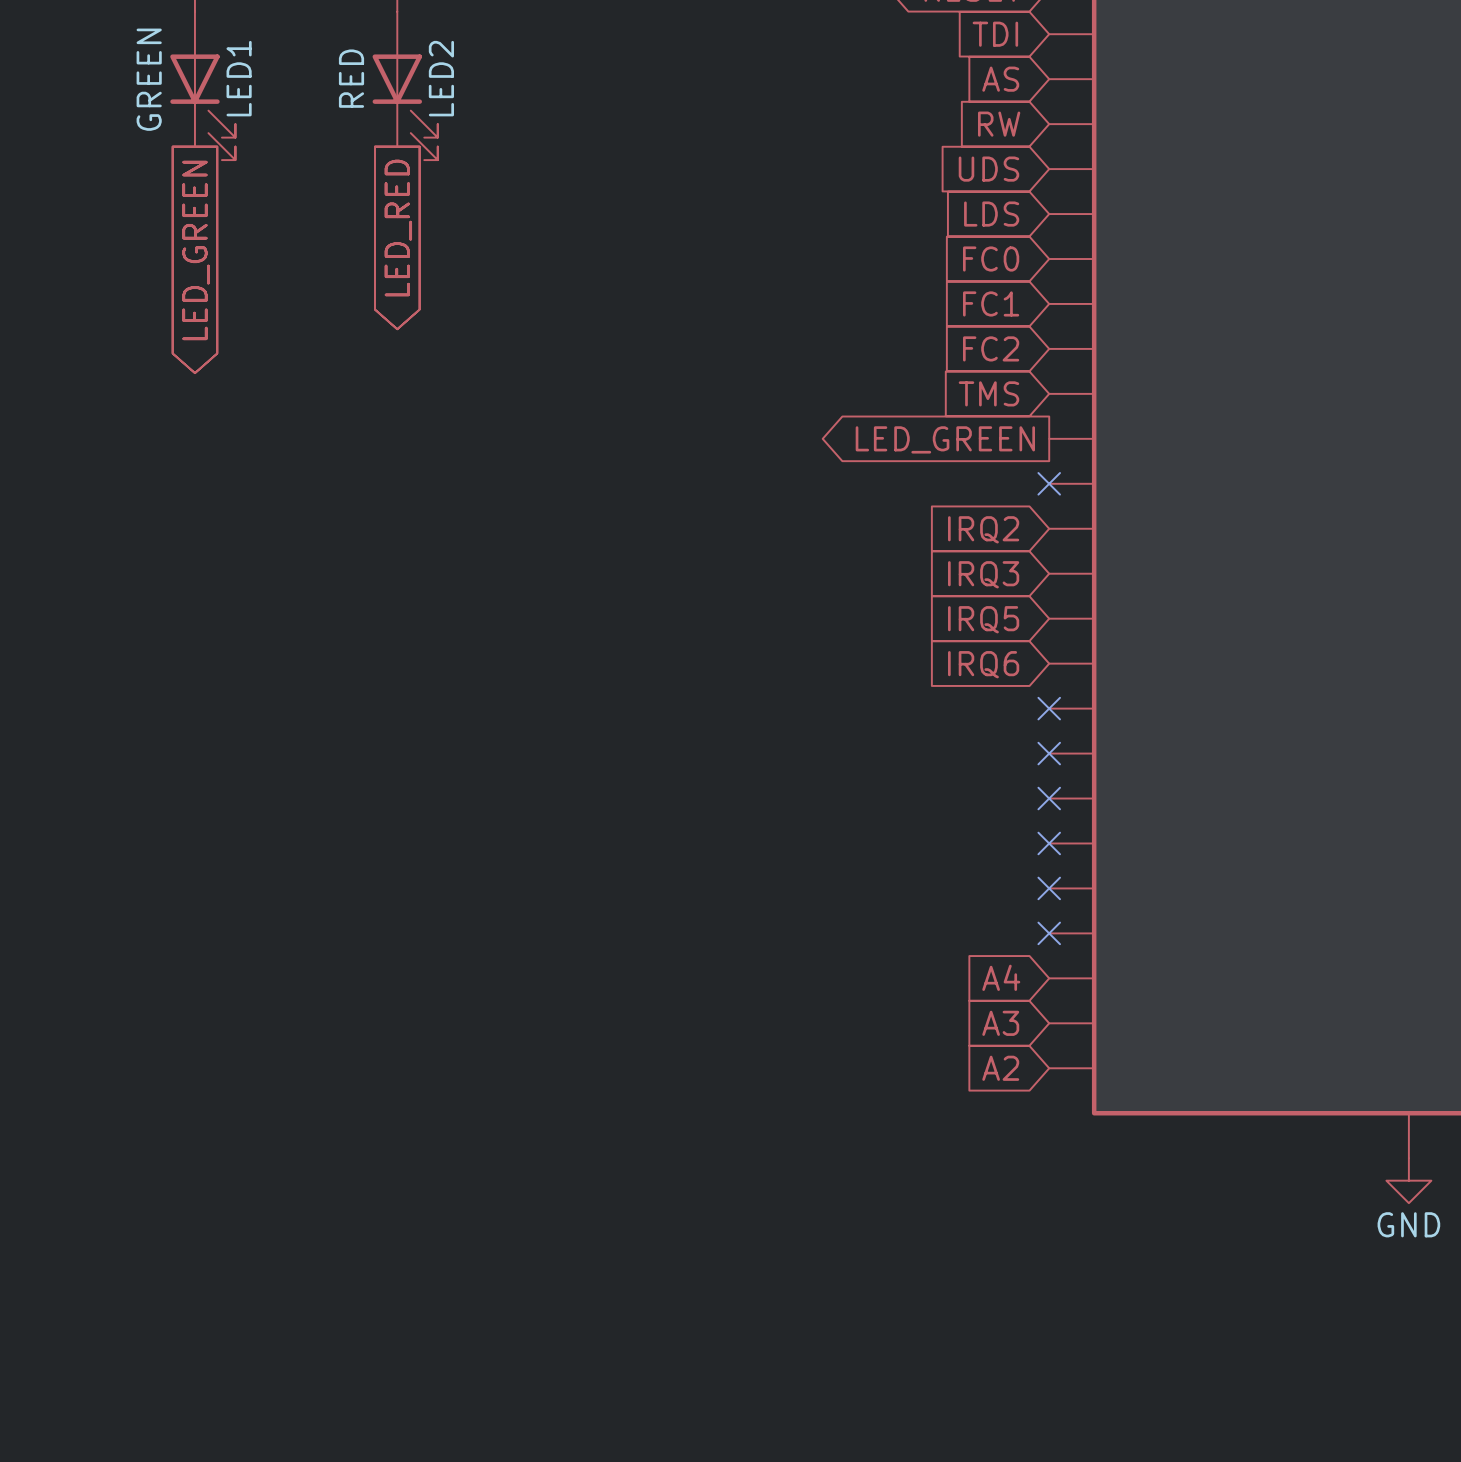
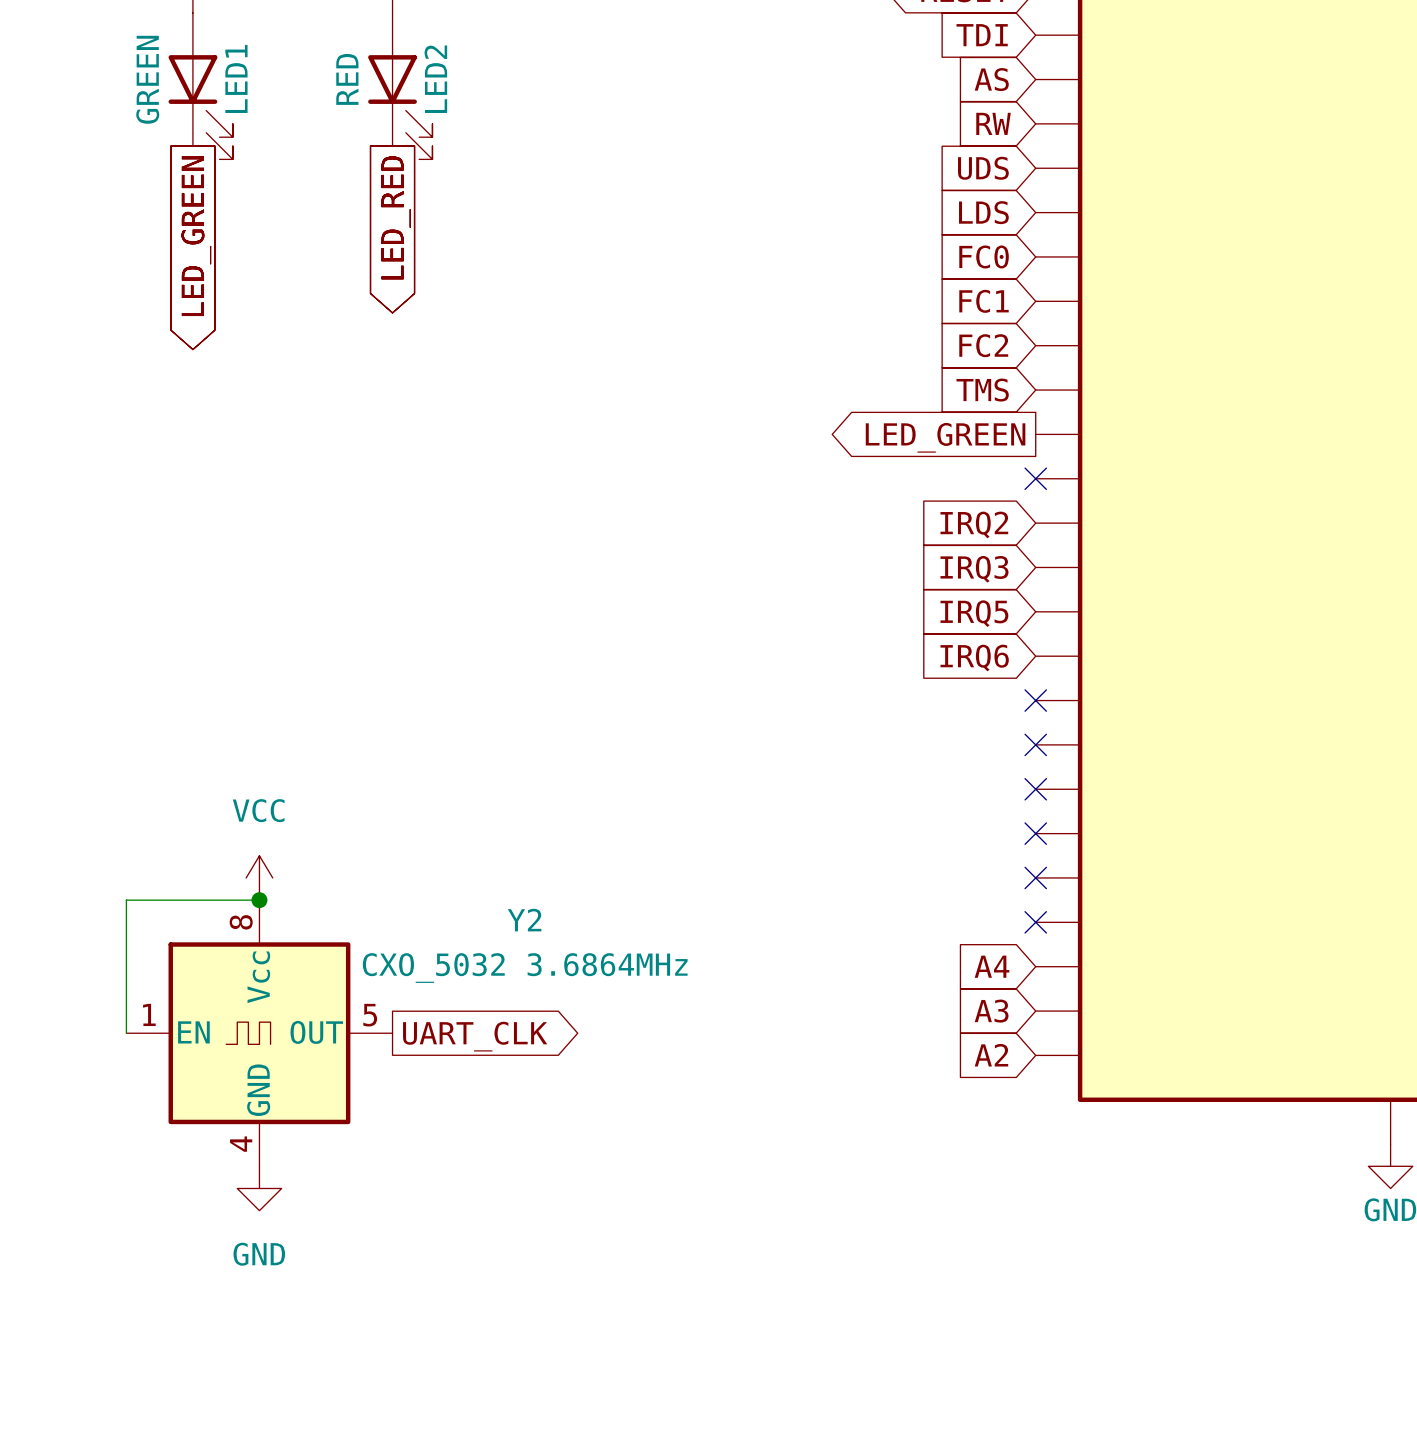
power symbol: none -> VCC (259, 877)
wire: none -> (259, 900) (126, 900) (126, 1033)
junction: none -> (259, 900)
Y2: none -> CXO_5032 3.6864MHz (259, 1033)
global label: none -> UART_CLK (475, 1036)
power symbol: none -> GND (259, 1188)

